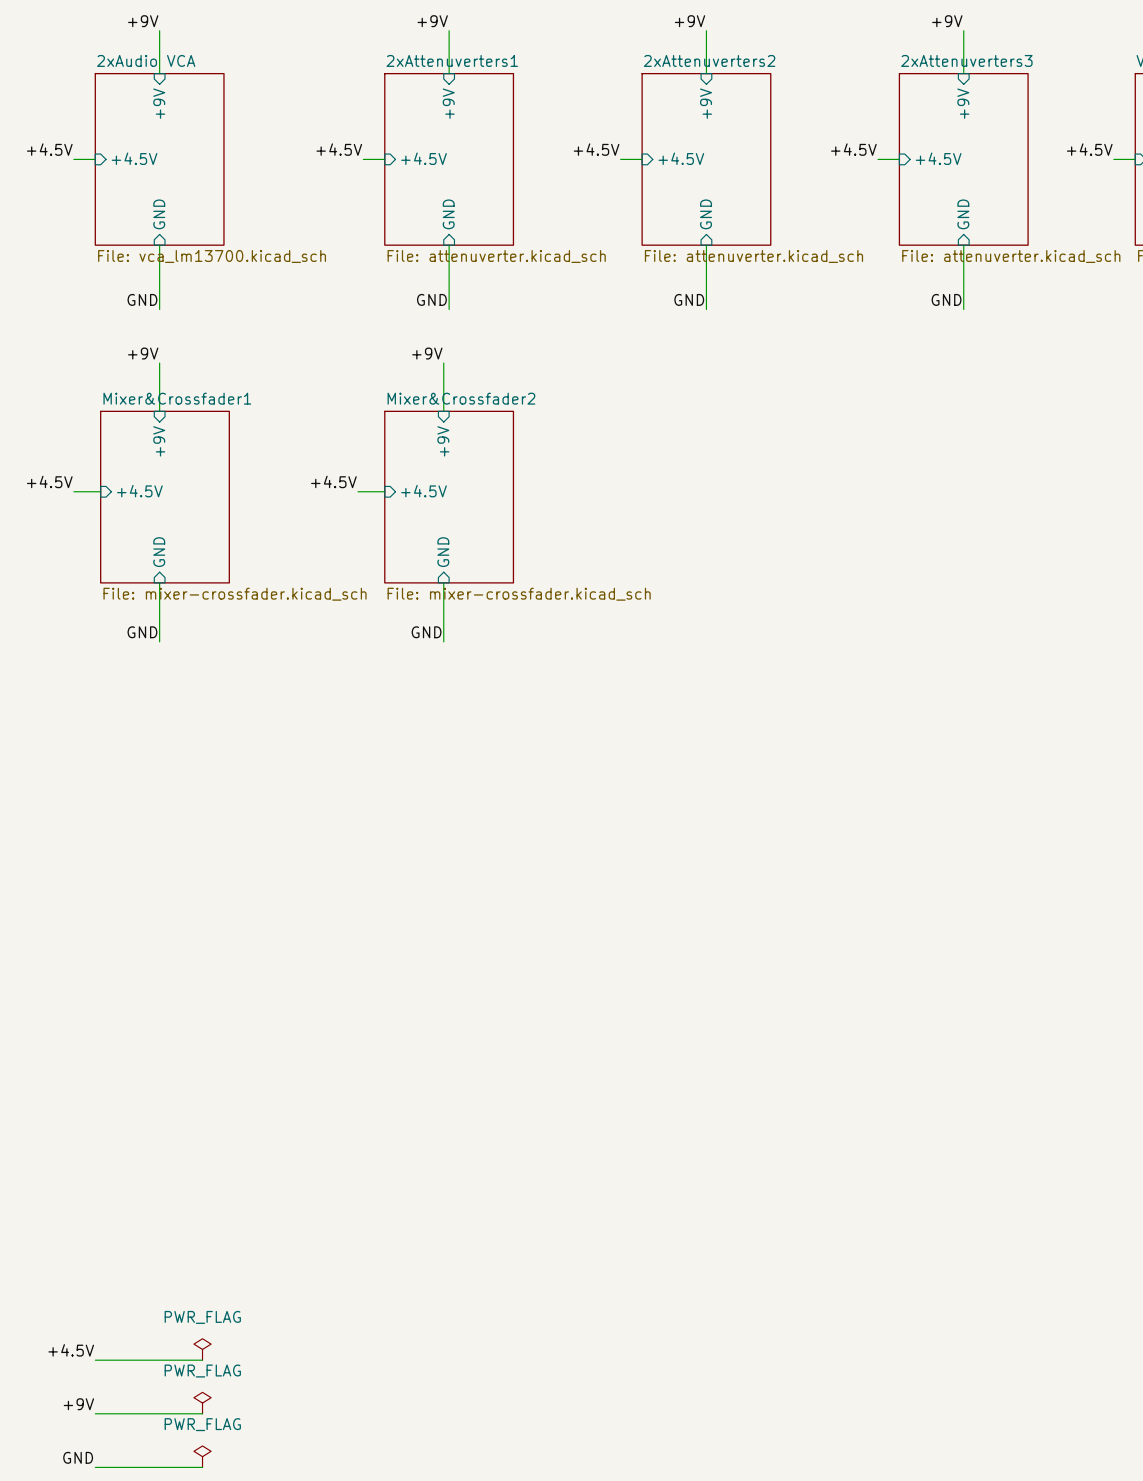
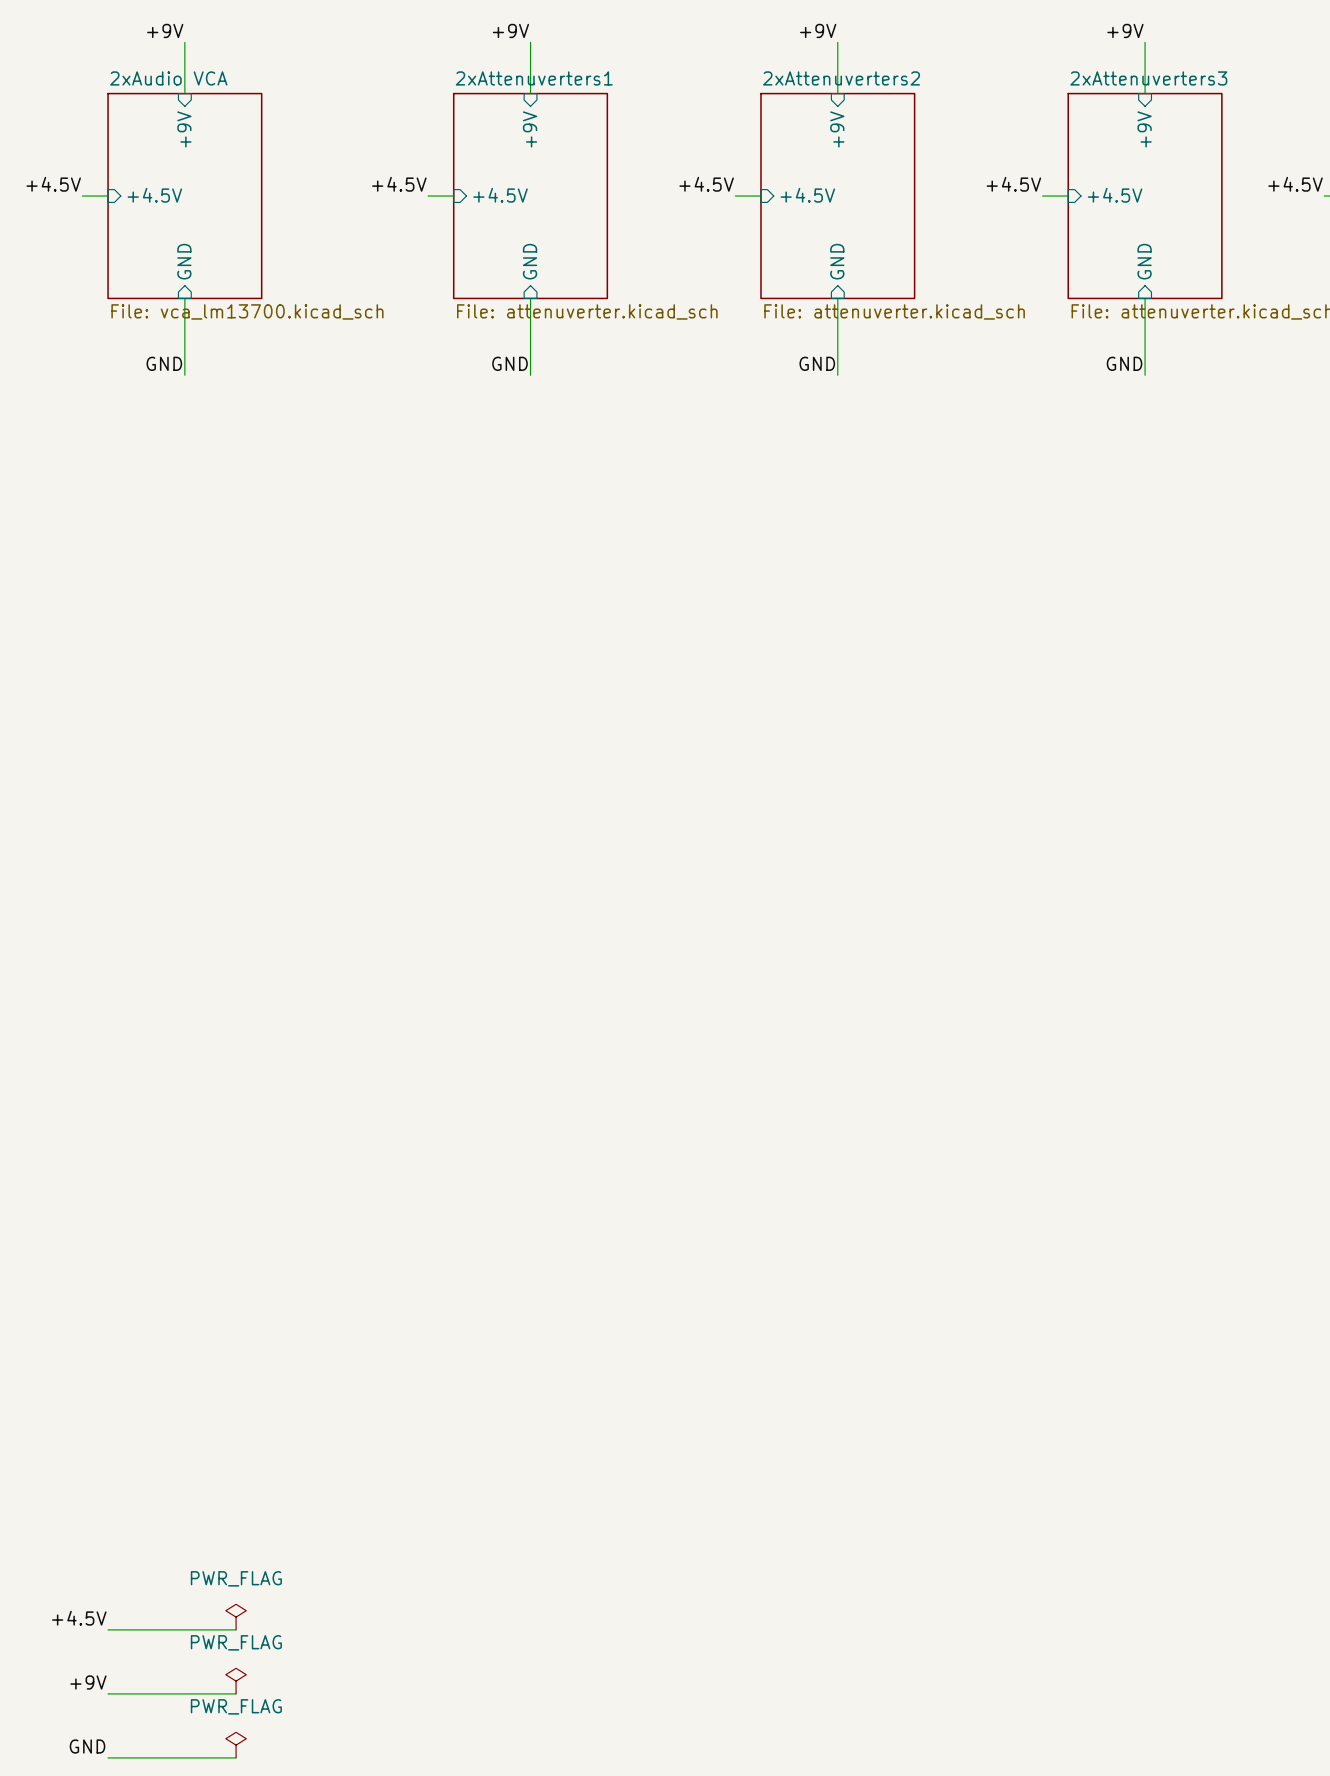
label: +9V (143, 353) -> none
label: +9V (427, 353) -> none
wire: (159, 363) (159, 411) -> none
wire: (443, 363) (443, 411) -> none
sheet pin: +9V (159, 441) -> none
sheet pin: +9V (443, 441) -> none
label: +4.5V (49, 481) -> none
label: +4.5V (333, 481) -> none
wire: (73, 491) (100, 491) -> none
sheet pin: +4.5V (139, 491) -> none
wire: (357, 491) (384, 491) -> none
sheet pin: +4.5V (424, 491) -> none
sheet Mixer&Crossfader1: File: mixer-crossfader.kicad_sch (165, 497) -> none
sheet Mixer&Crossfader2: File: mixer-crossfader.kicad_sch (449, 497) -> none
sheet pin: GND (159, 552) -> none
sheet pin: GND (443, 552) -> none
wire: (159, 582) (159, 641) -> none
wire: (443, 582) (443, 641) -> none
label: GND (142, 632) -> none
label: GND (426, 632) -> none

